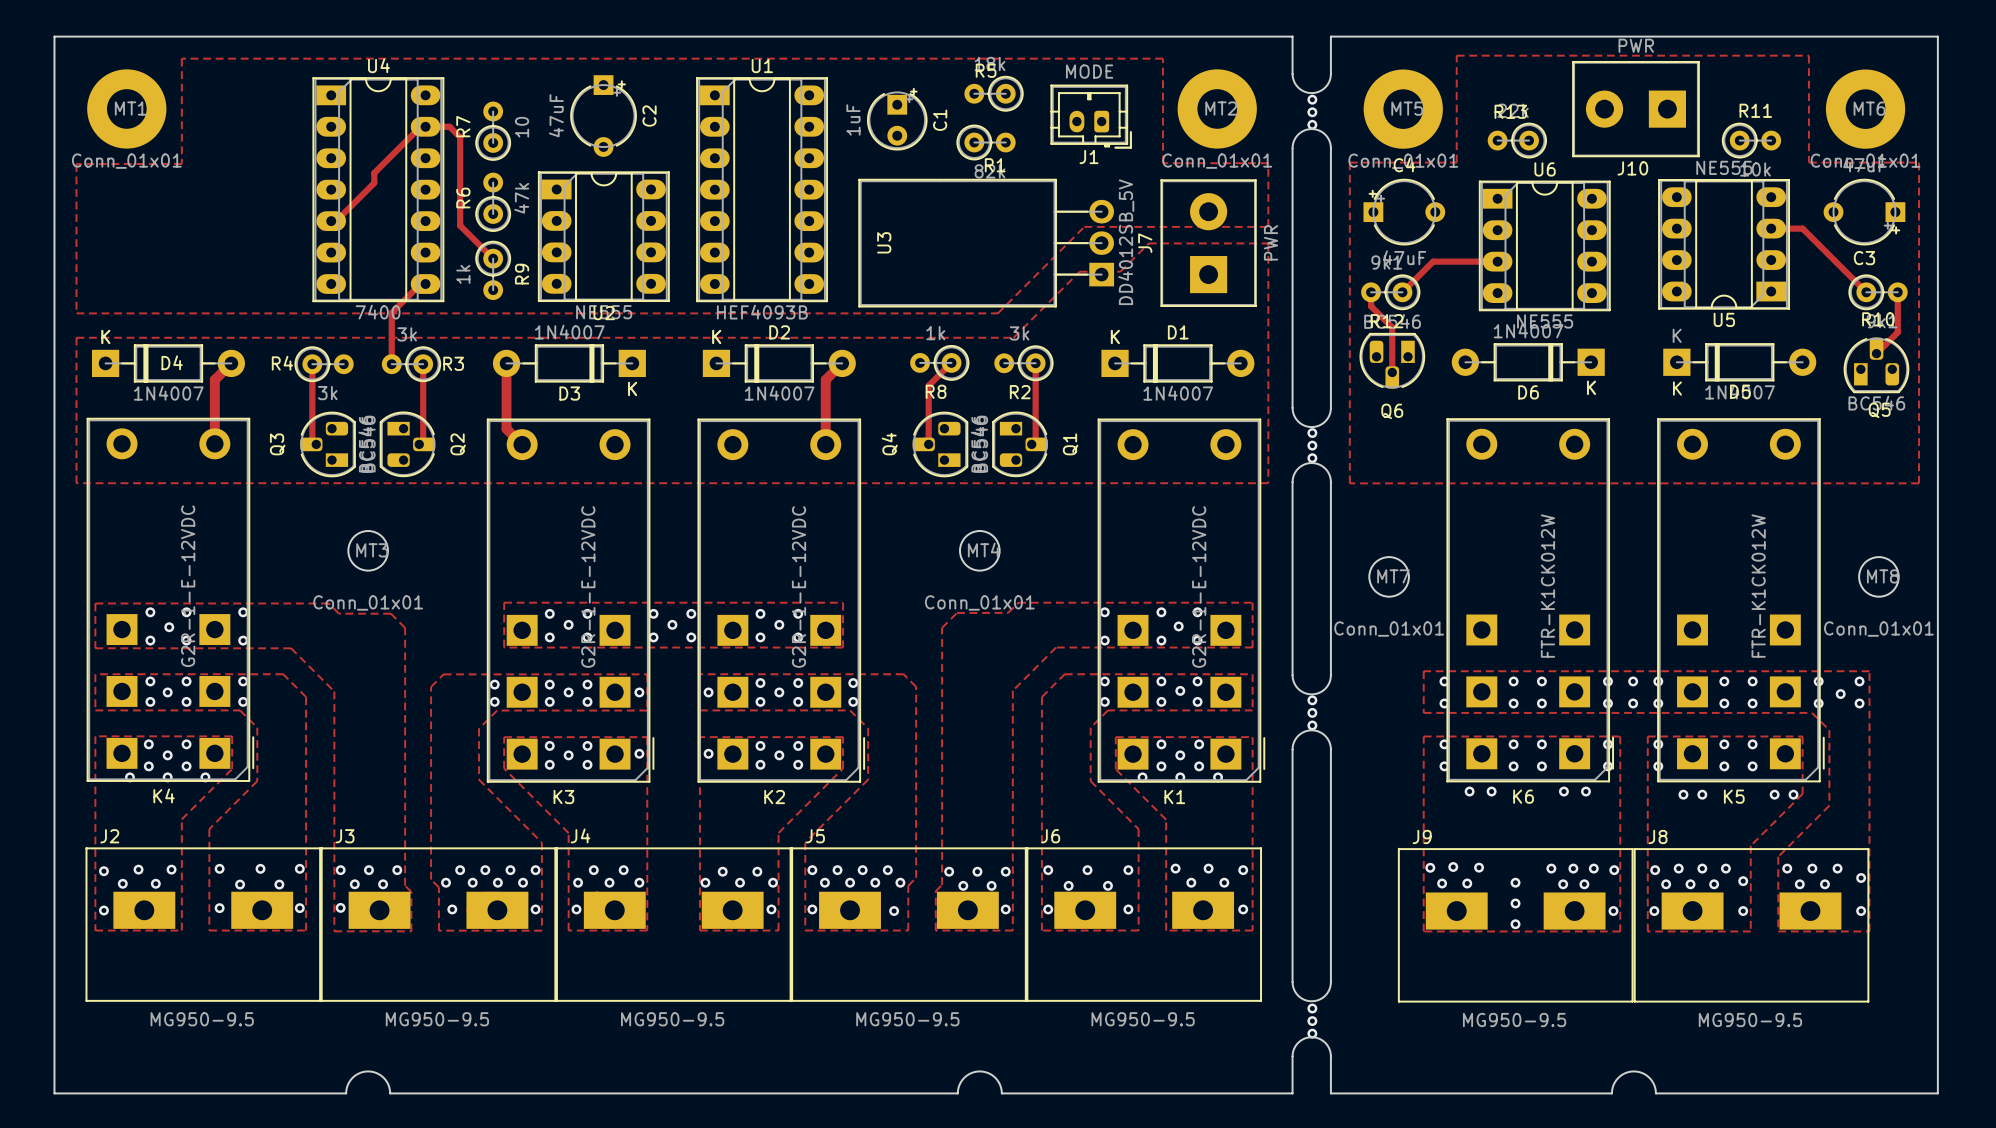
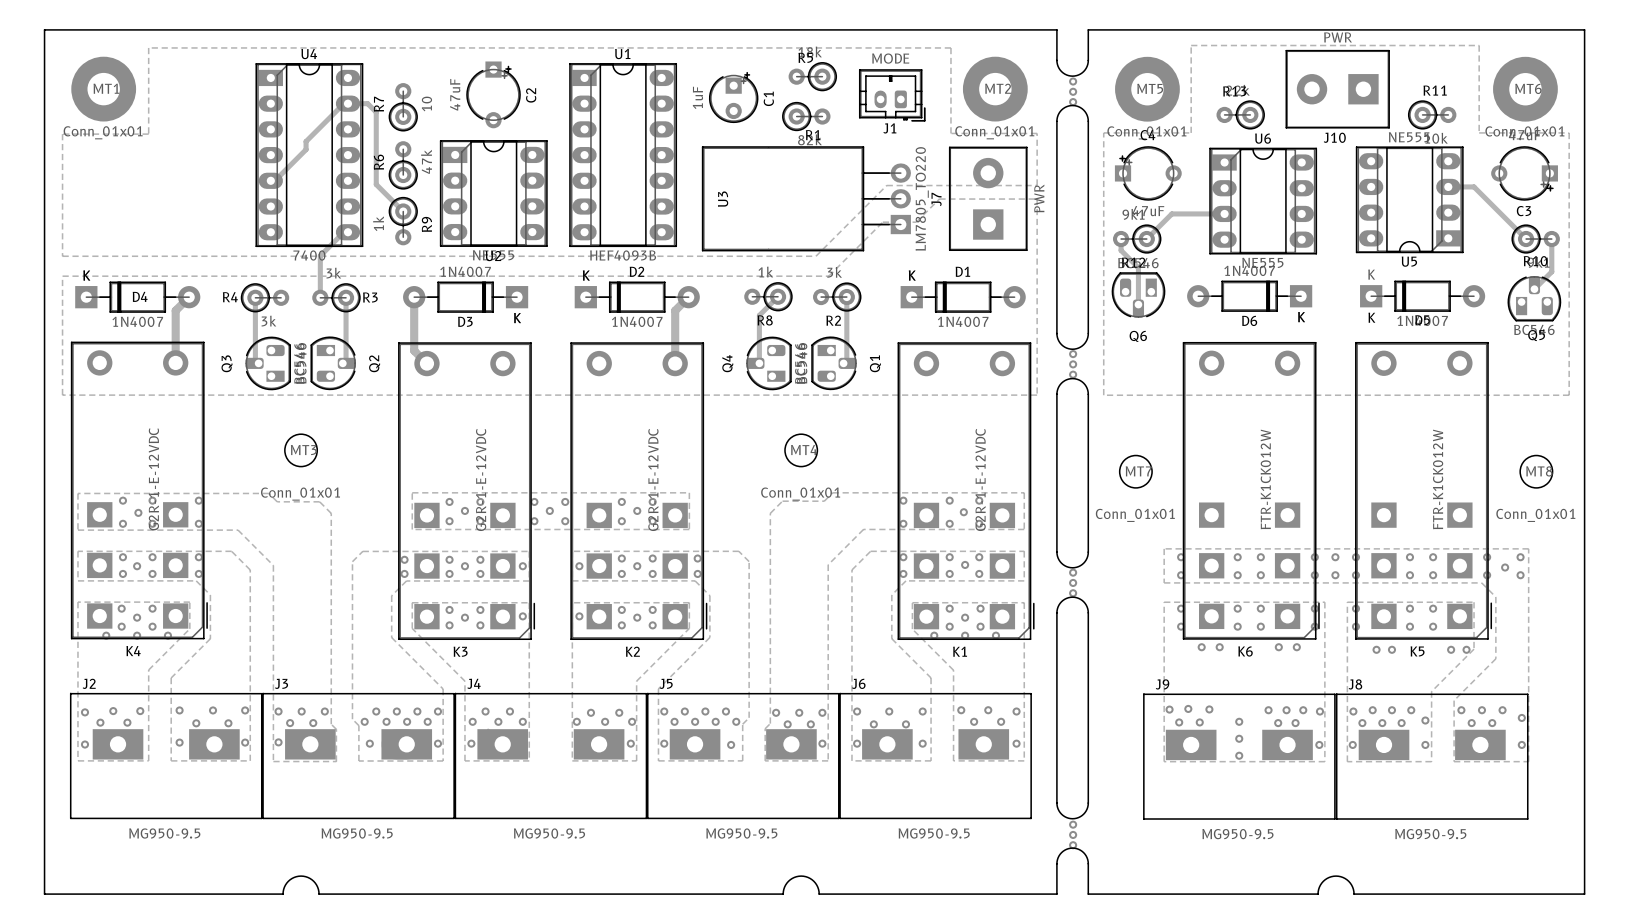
U3 value: DD4012SB_5V (1126, 242) -> LM7805_TO220 (922, 198)

